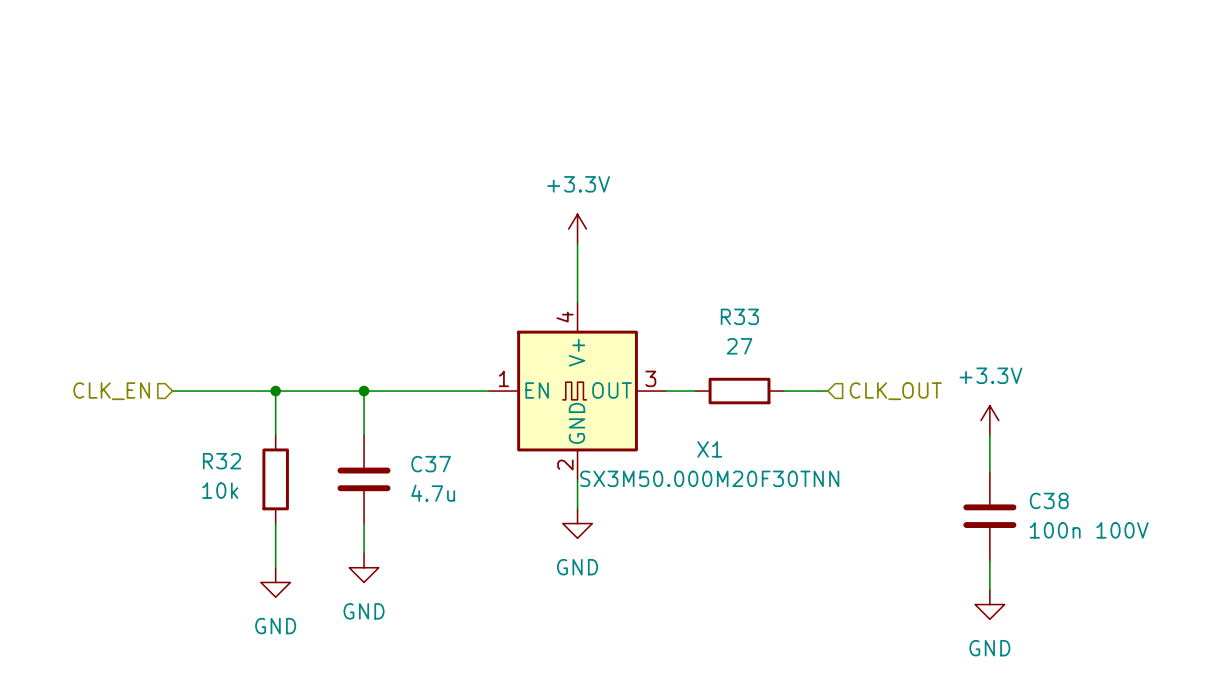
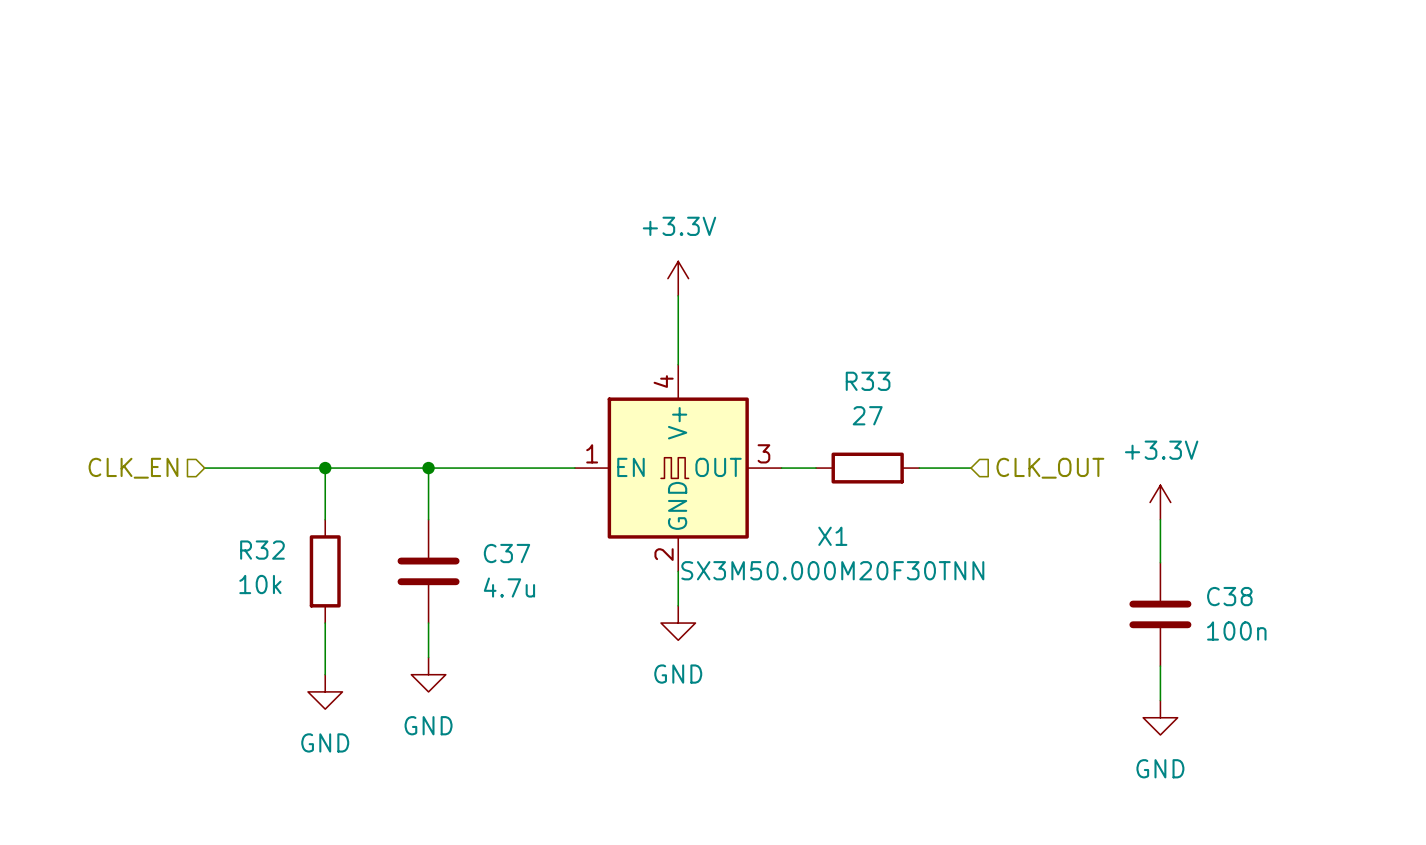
C38 value: 100n 100V (1089, 530) -> 100n (1236, 631)

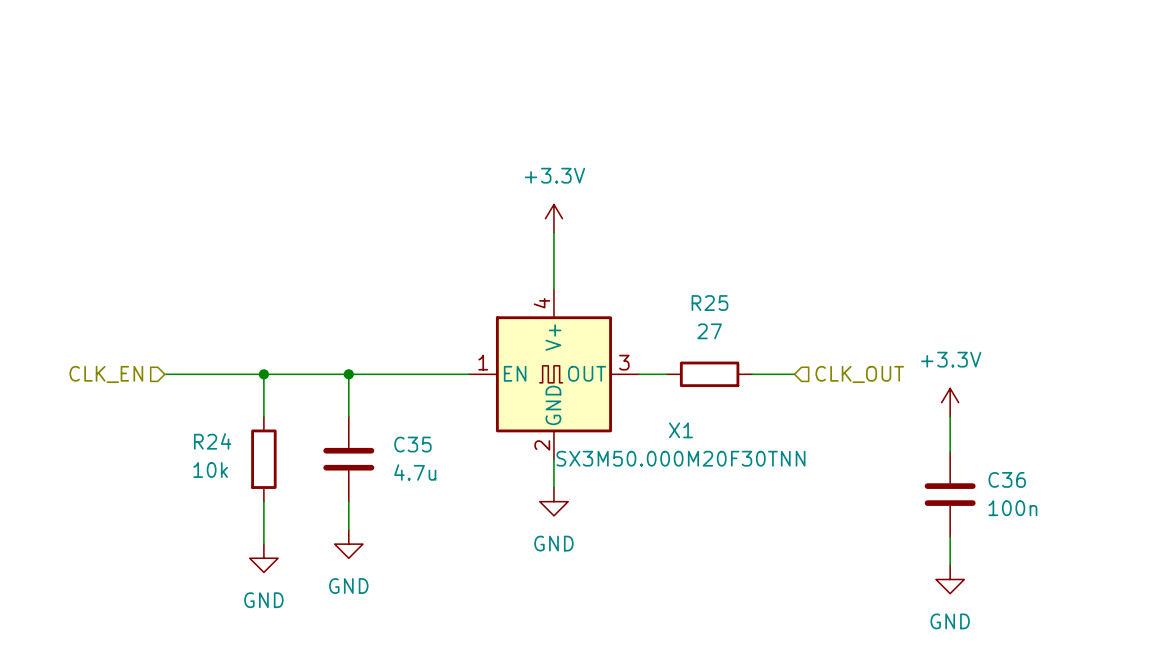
R33 name: R33 (868, 381) -> R25 (709, 303)
R32 name: R32 (262, 550) -> R24 (212, 441)
C37 name: C37 (506, 553) -> C35 (412, 444)
C38 name: C38 (1229, 596) -> C36 (1007, 479)

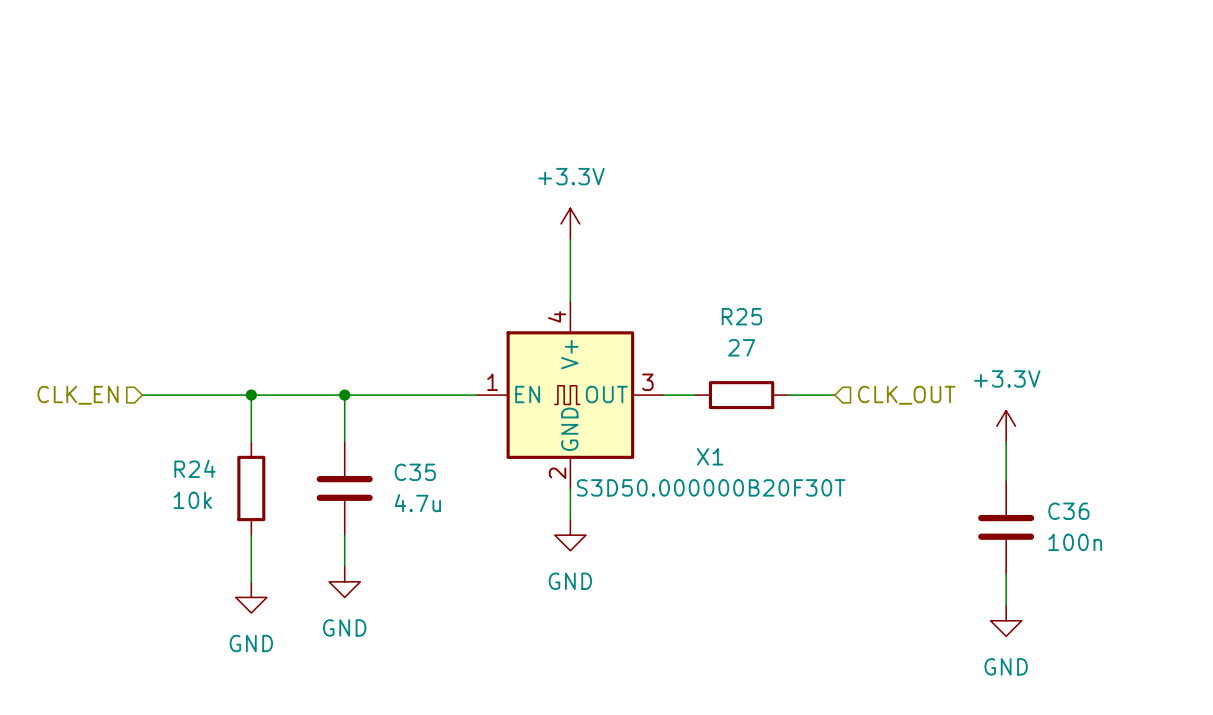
X1 value: SX3M50.000M20F30TNN (680, 458) -> S3D50.000000B20F30T (711, 487)

